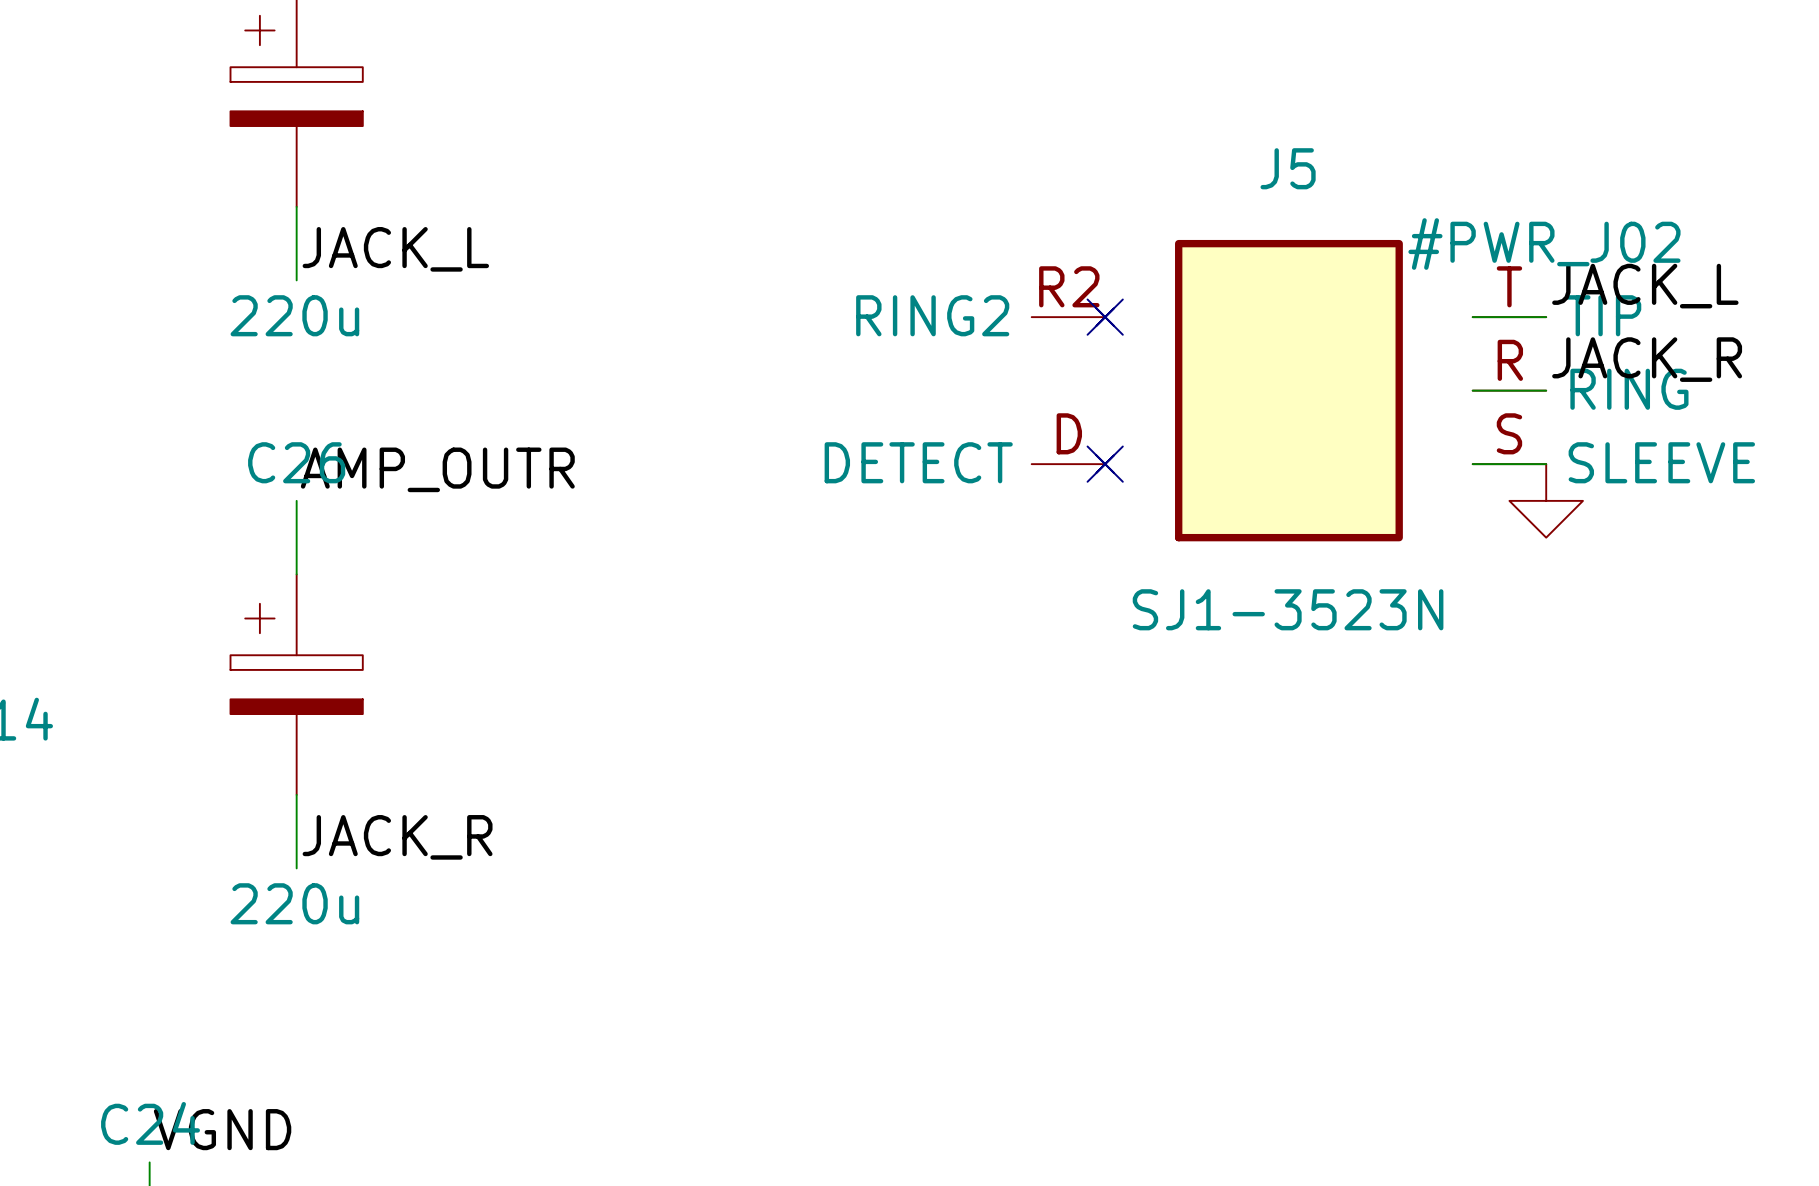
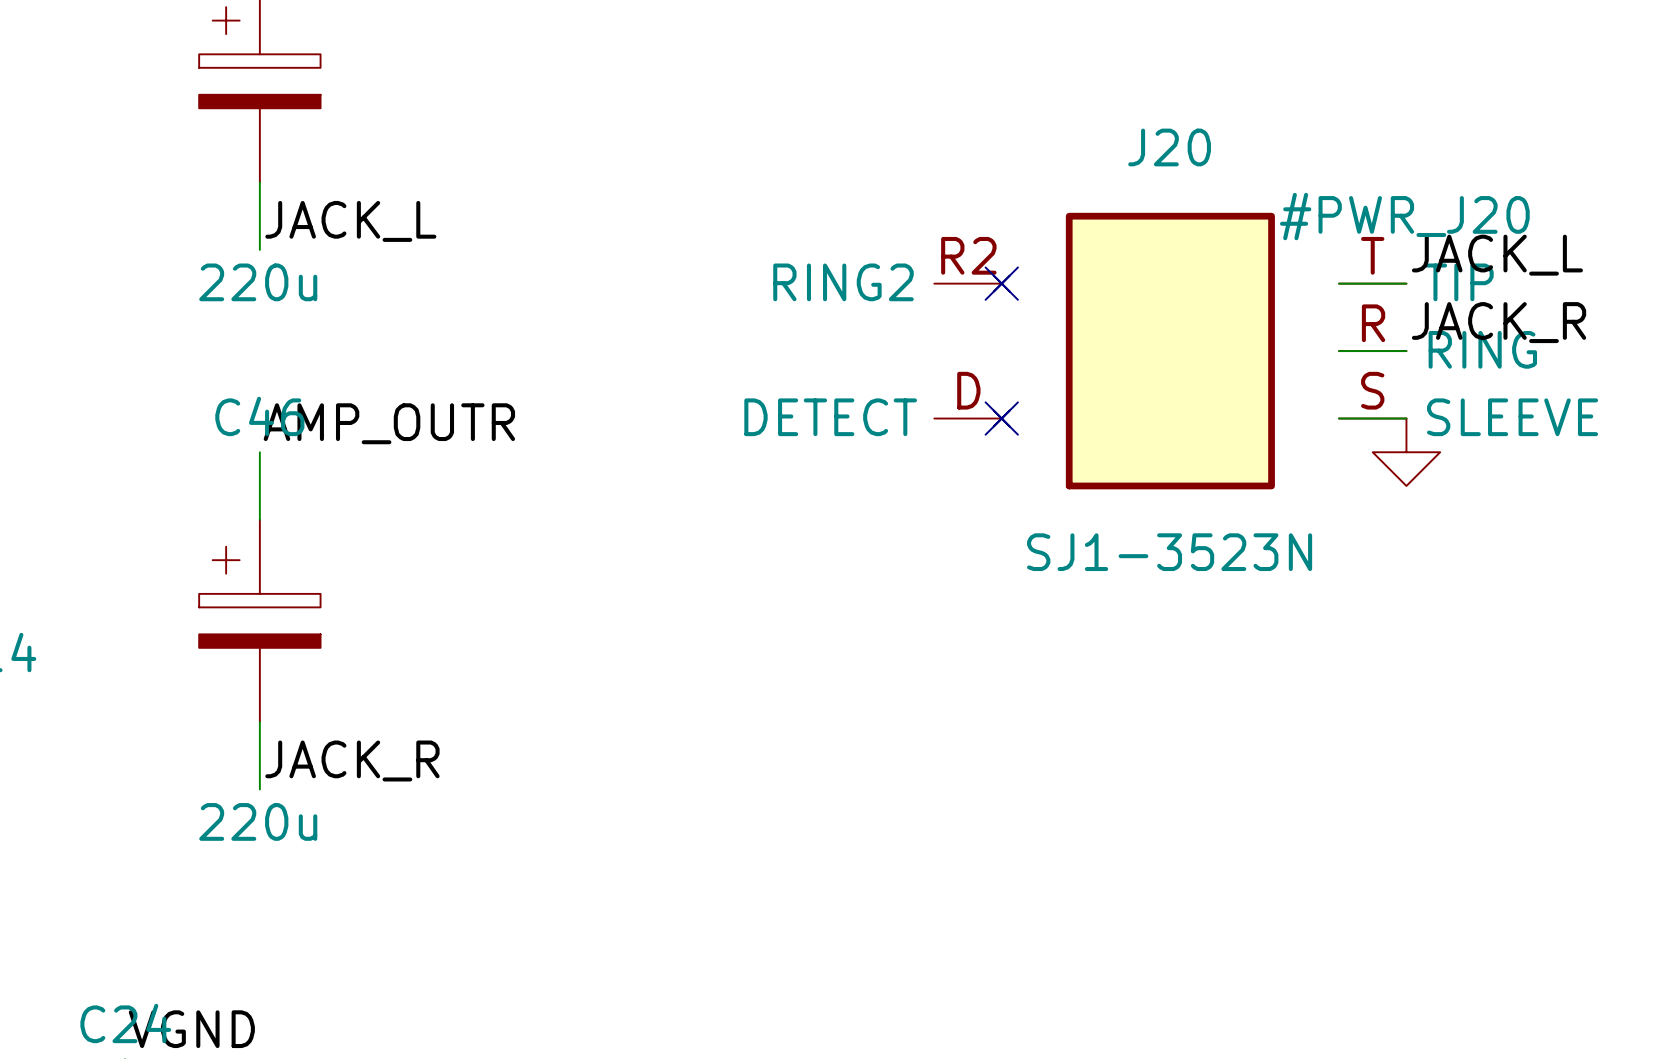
J5 name: J5 (1288, 168) -> J20 (1169, 147)
#PWR_J02 name: #PWR_J02 (1544, 244) -> #PWR_J20 (1404, 216)
C26 name: C26 (296, 462) -> C46 (259, 416)

